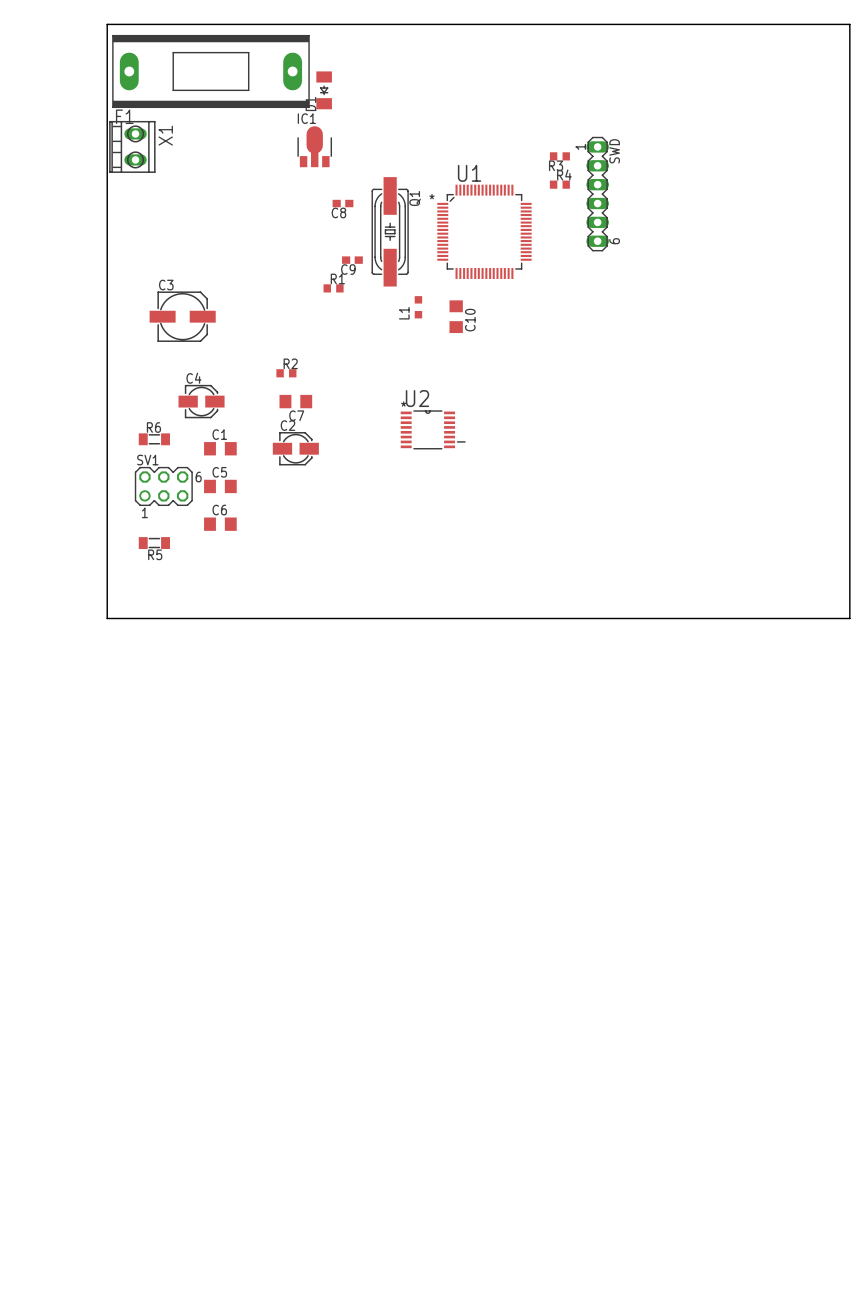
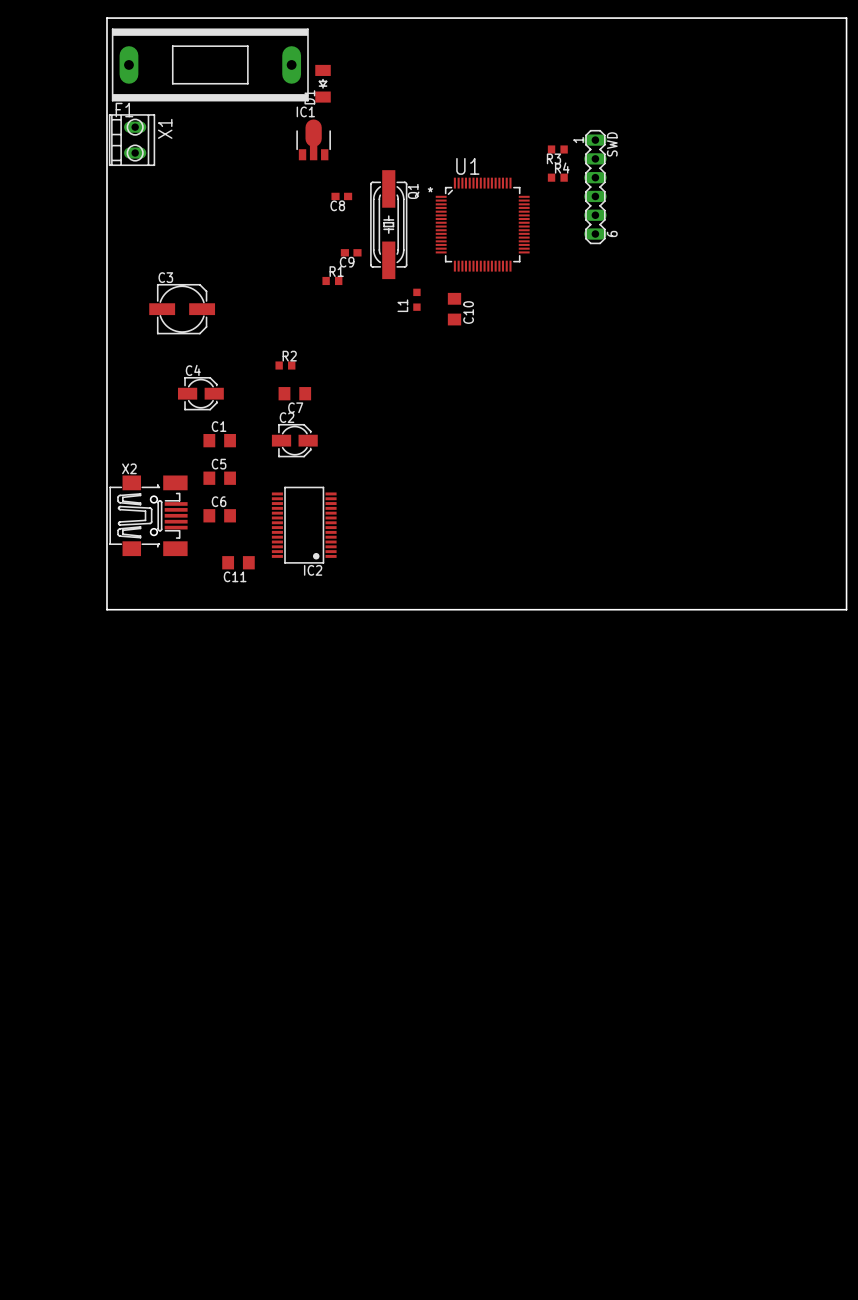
U2: (433, 429) -> none
R6: (154, 439) -> none
SV1: (163, 486) -> none
X2: none -> (148, 515)
IC2: none -> (304, 525)
R5: (154, 543) -> none
C11: none -> (238, 562)

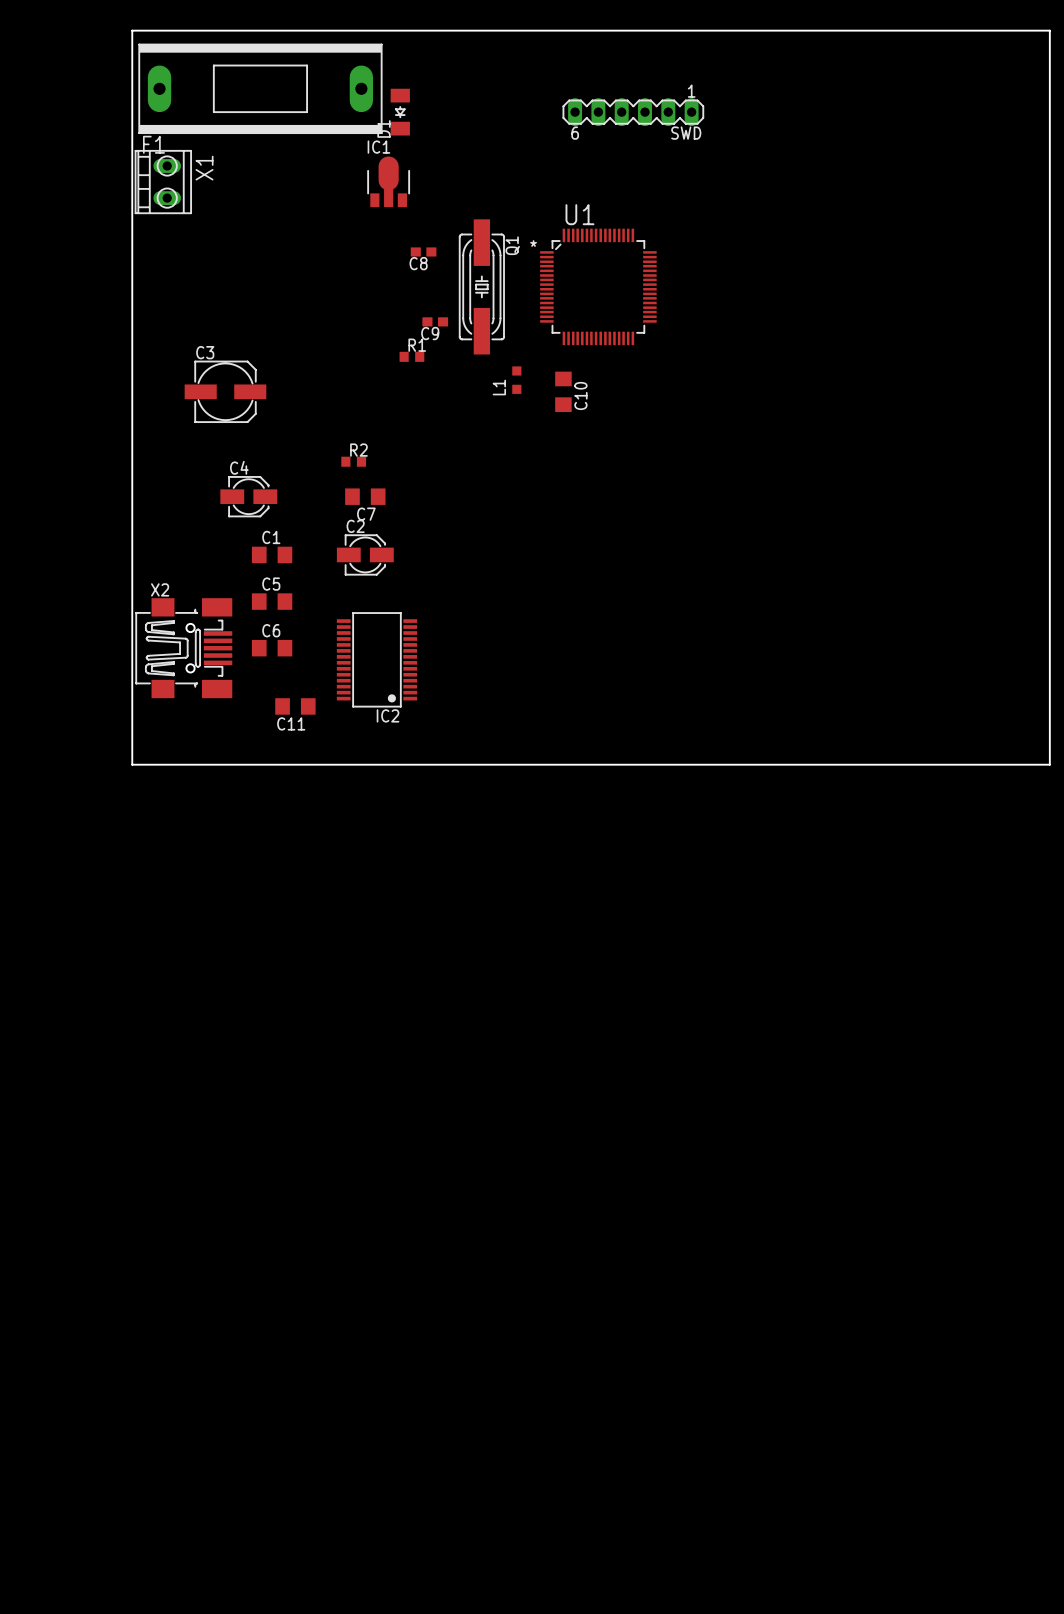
R3: (557, 149) -> none
R4: (557, 177) -> none
SWD rotation: 0° (595, 187) -> 90° clockwise (633, 112)
SWD position: (595, 187) -> (633, 112)

